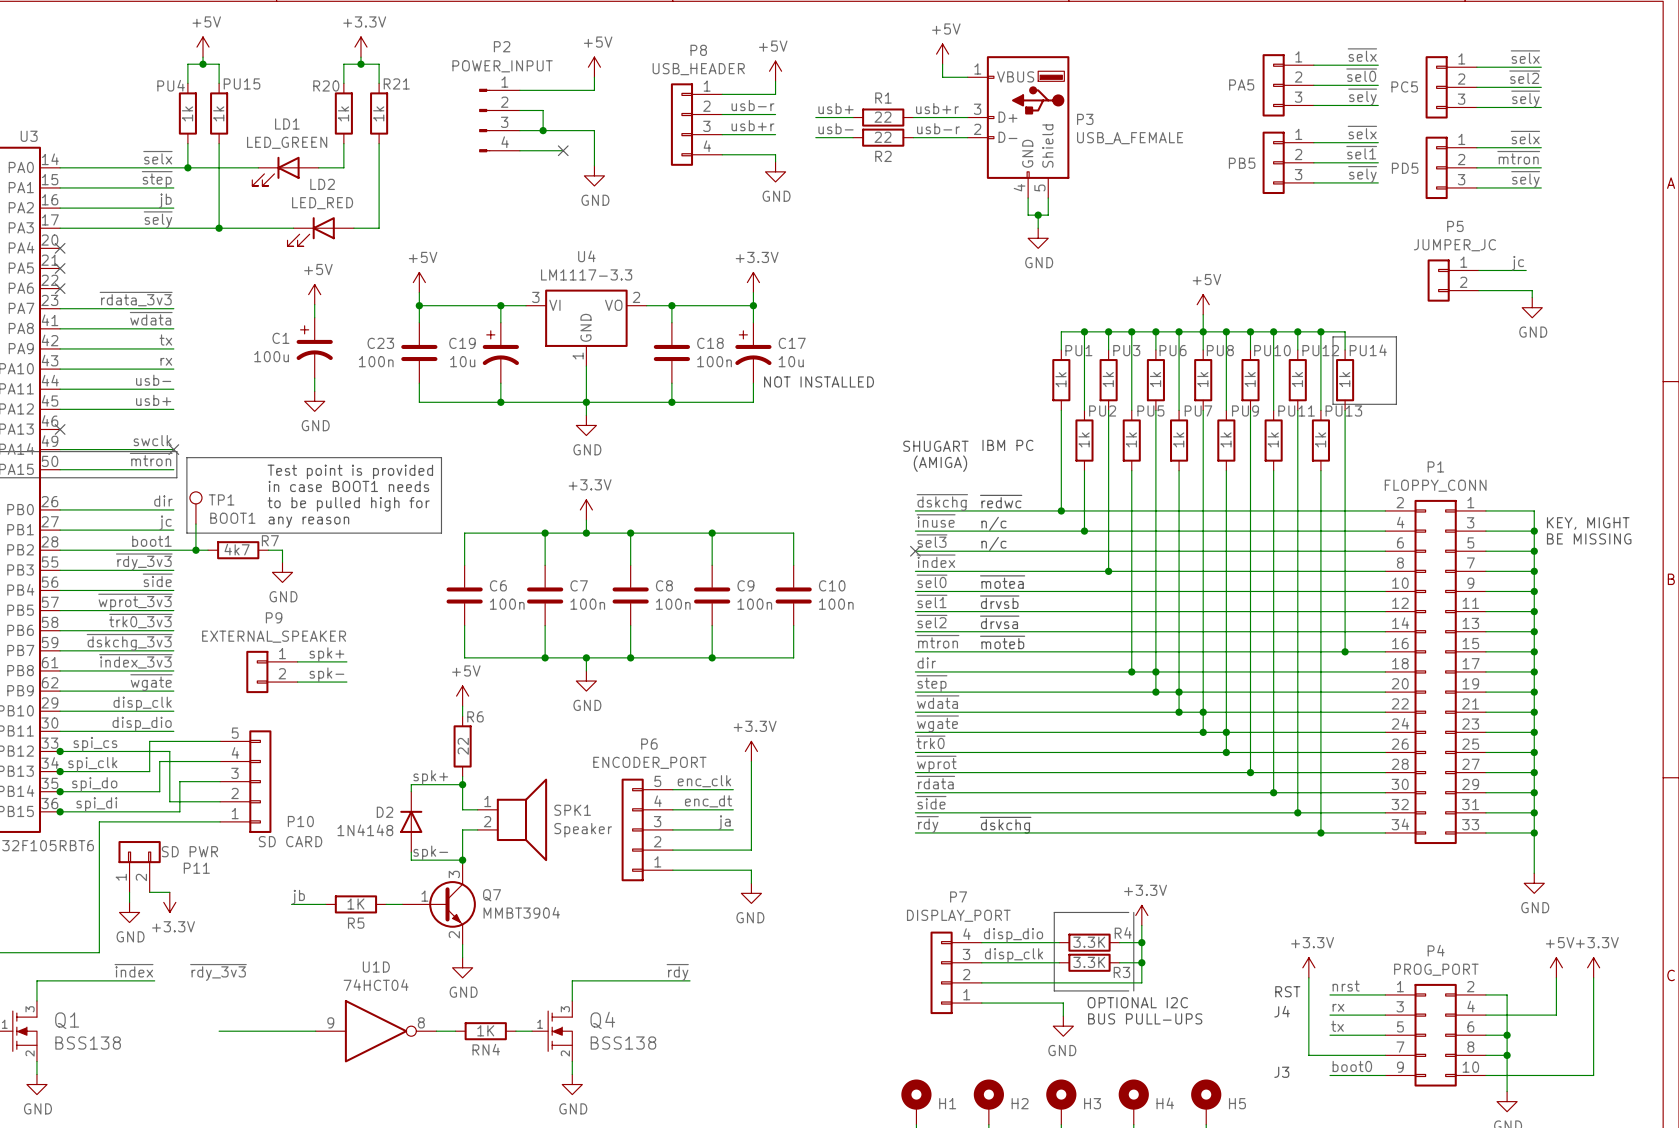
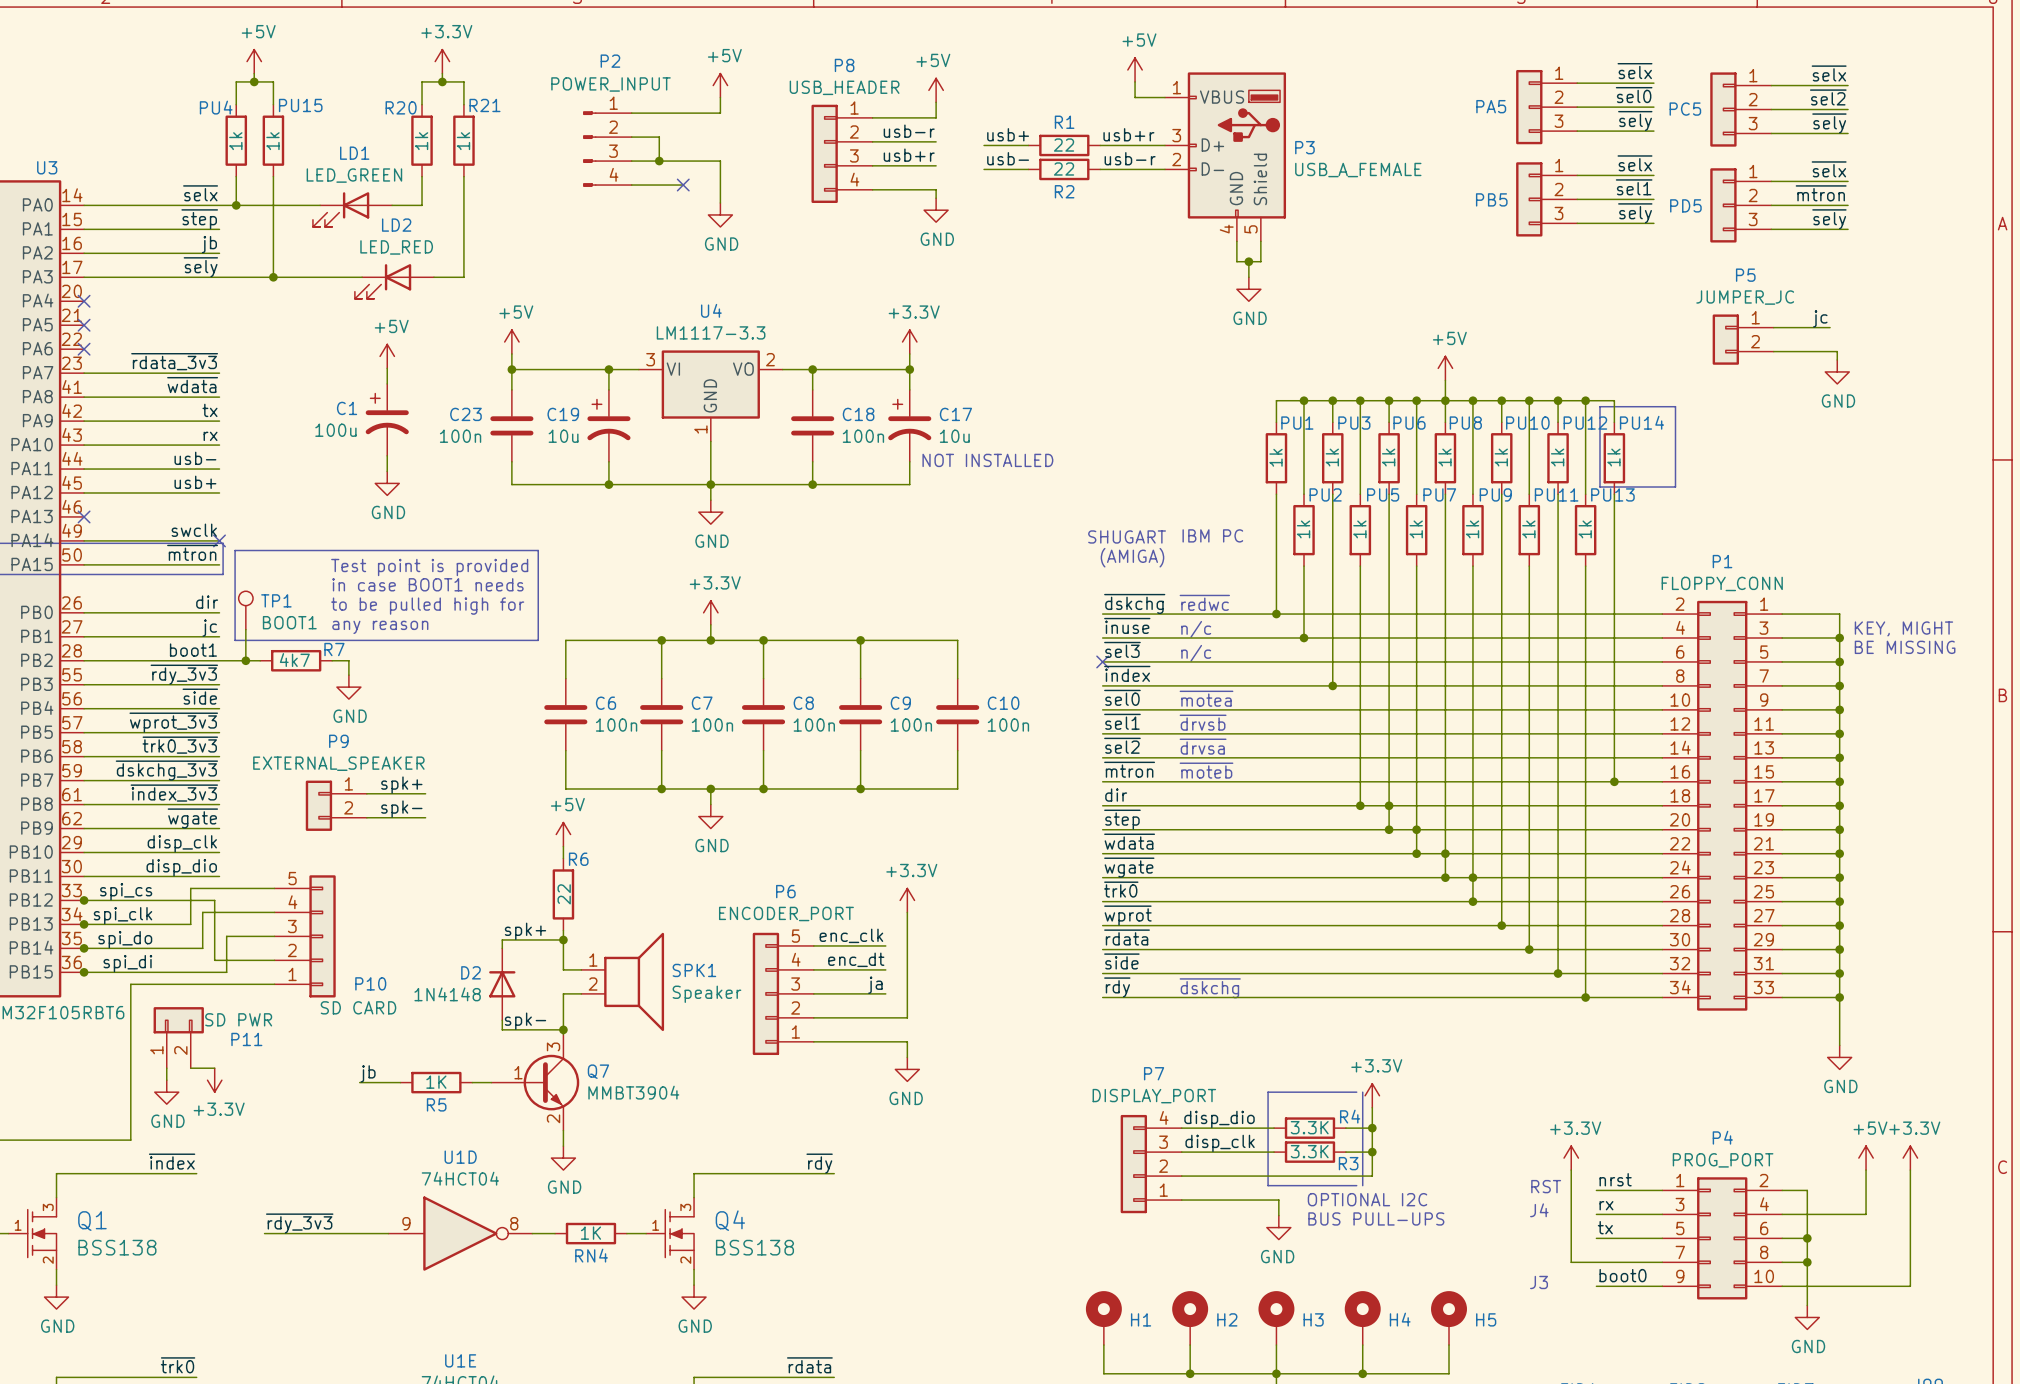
label position: ~{rdy_3v3} (218, 972) -> ~{rdy_3v3} (299, 1223)
wire: none -> (264, 1233) (273, 1233)

